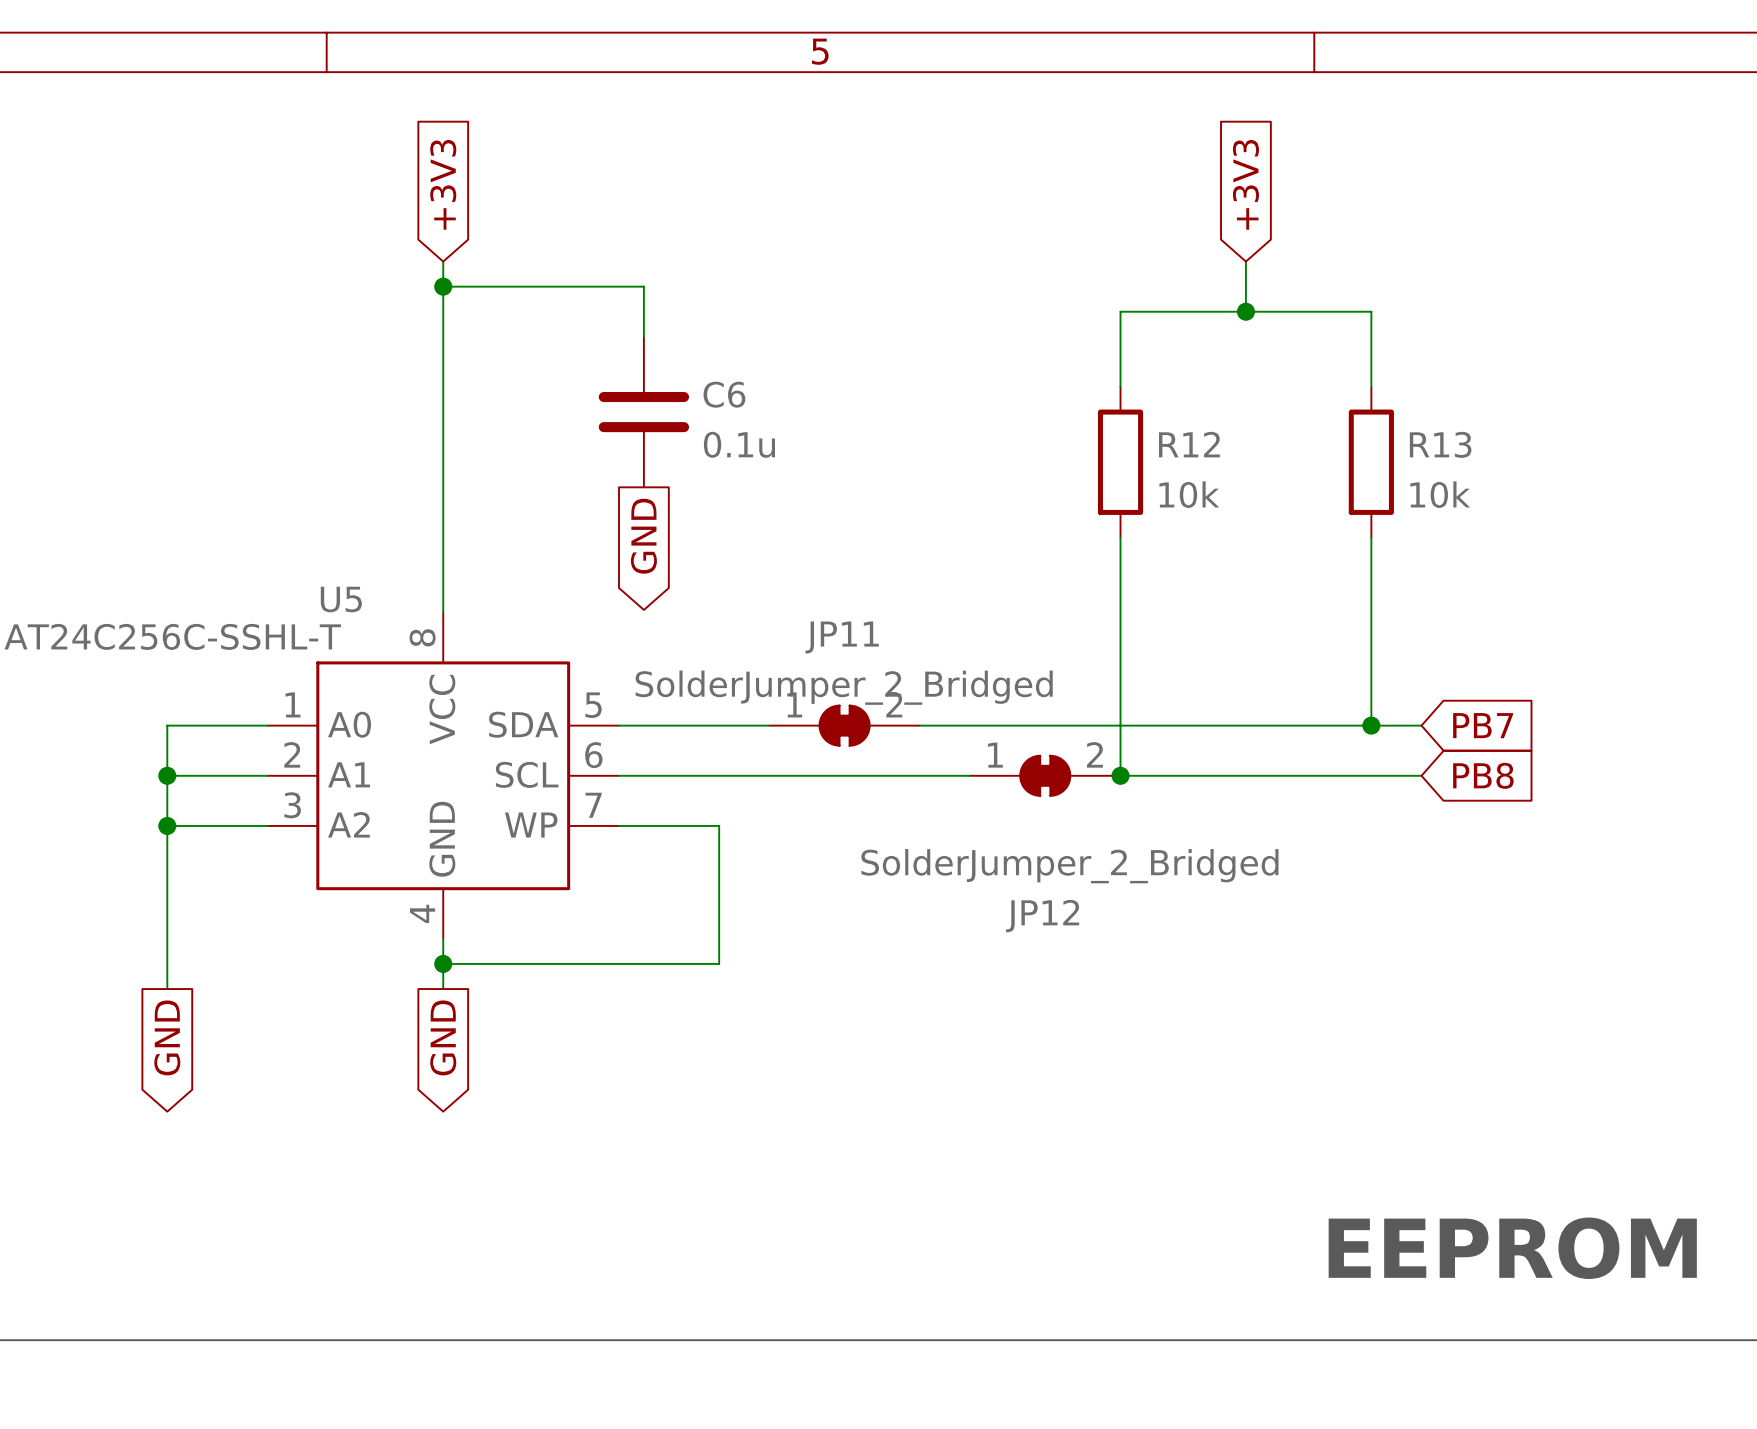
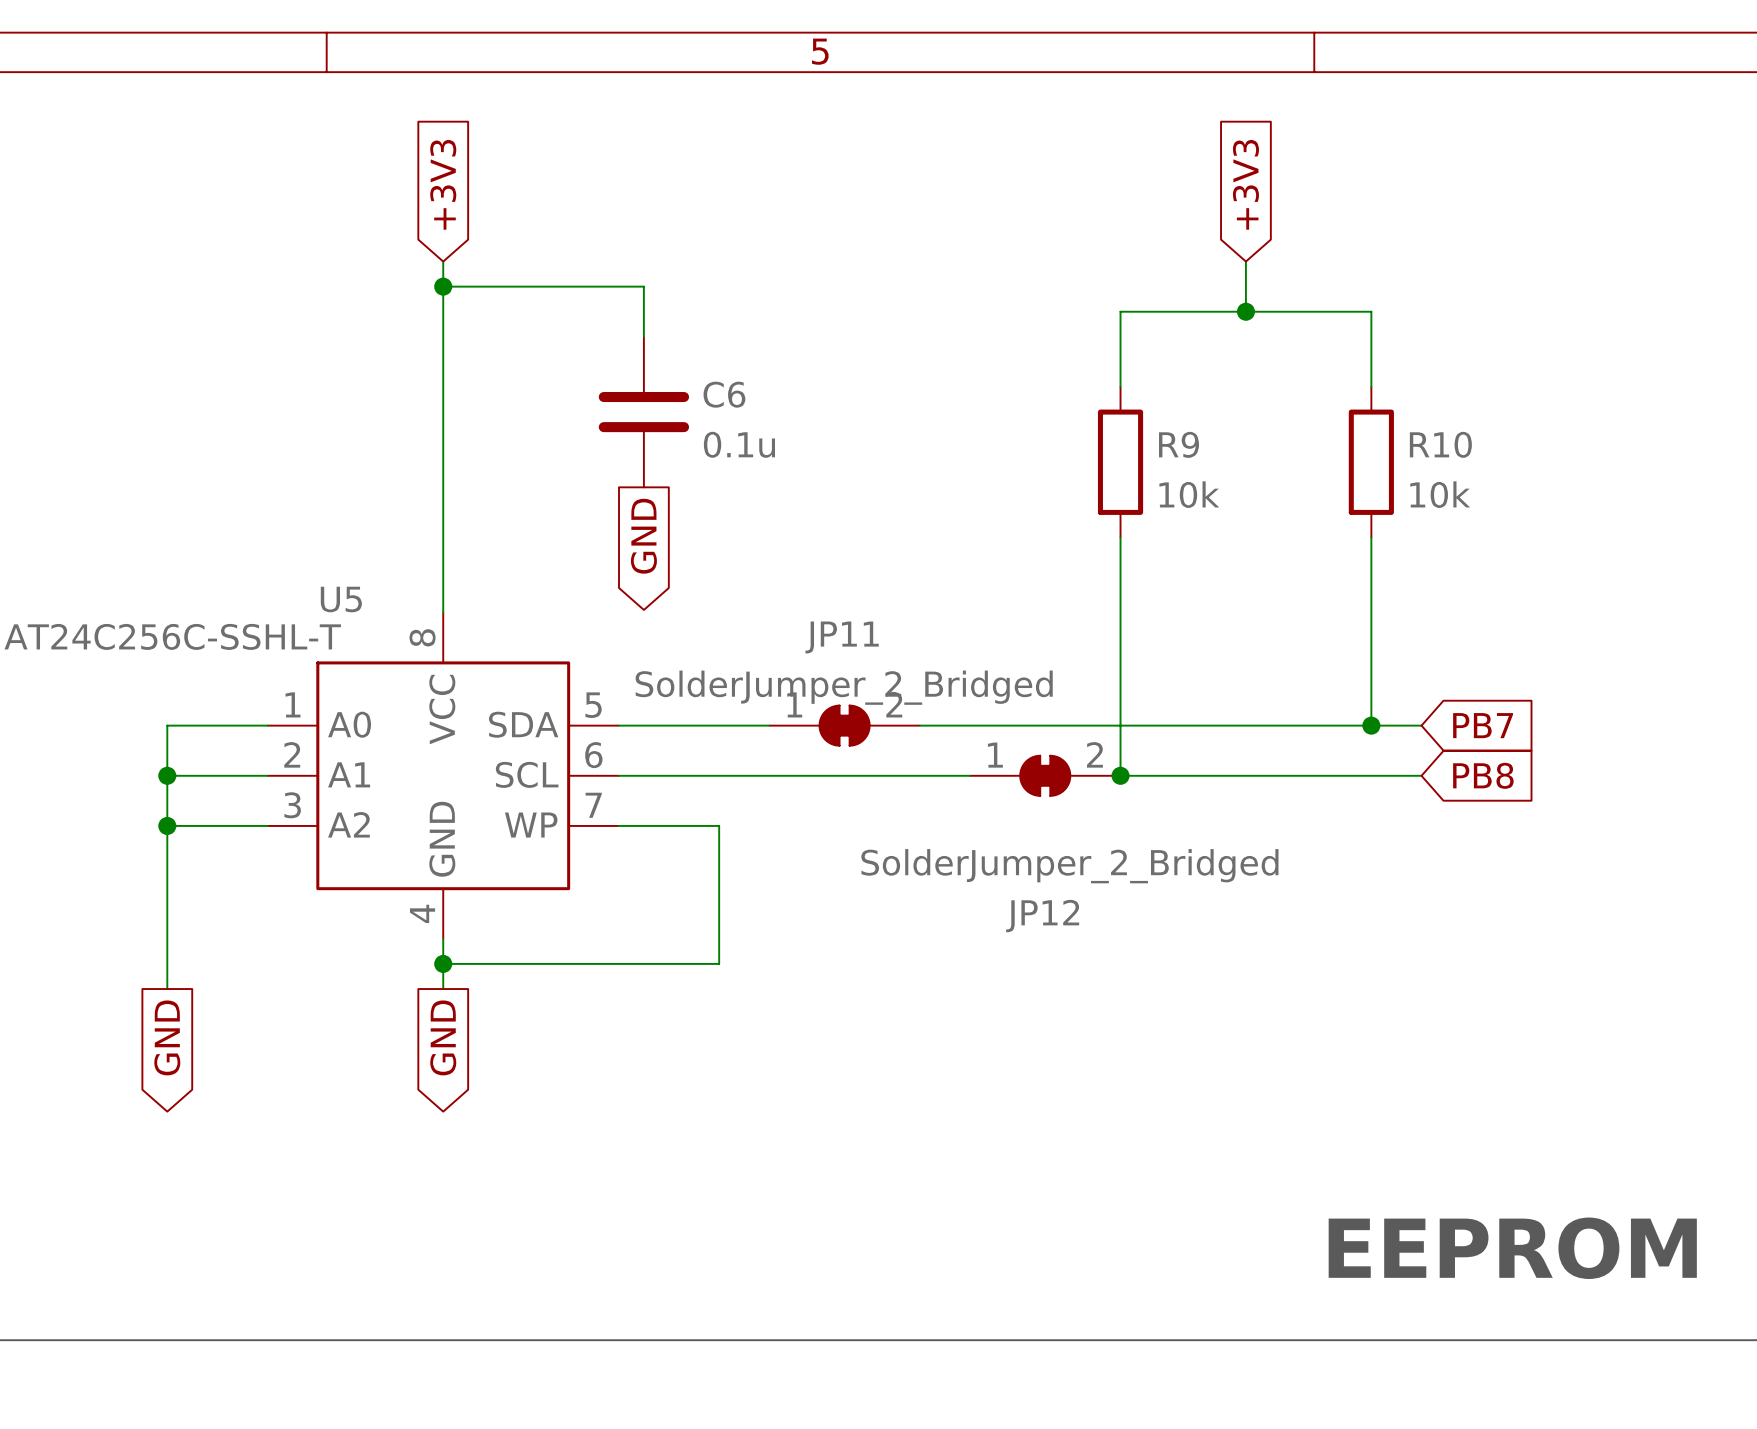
R12 name: R12 (1189, 444) -> R9 (1179, 444)
R13 name: R13 (1440, 444) -> R10 (1440, 444)

